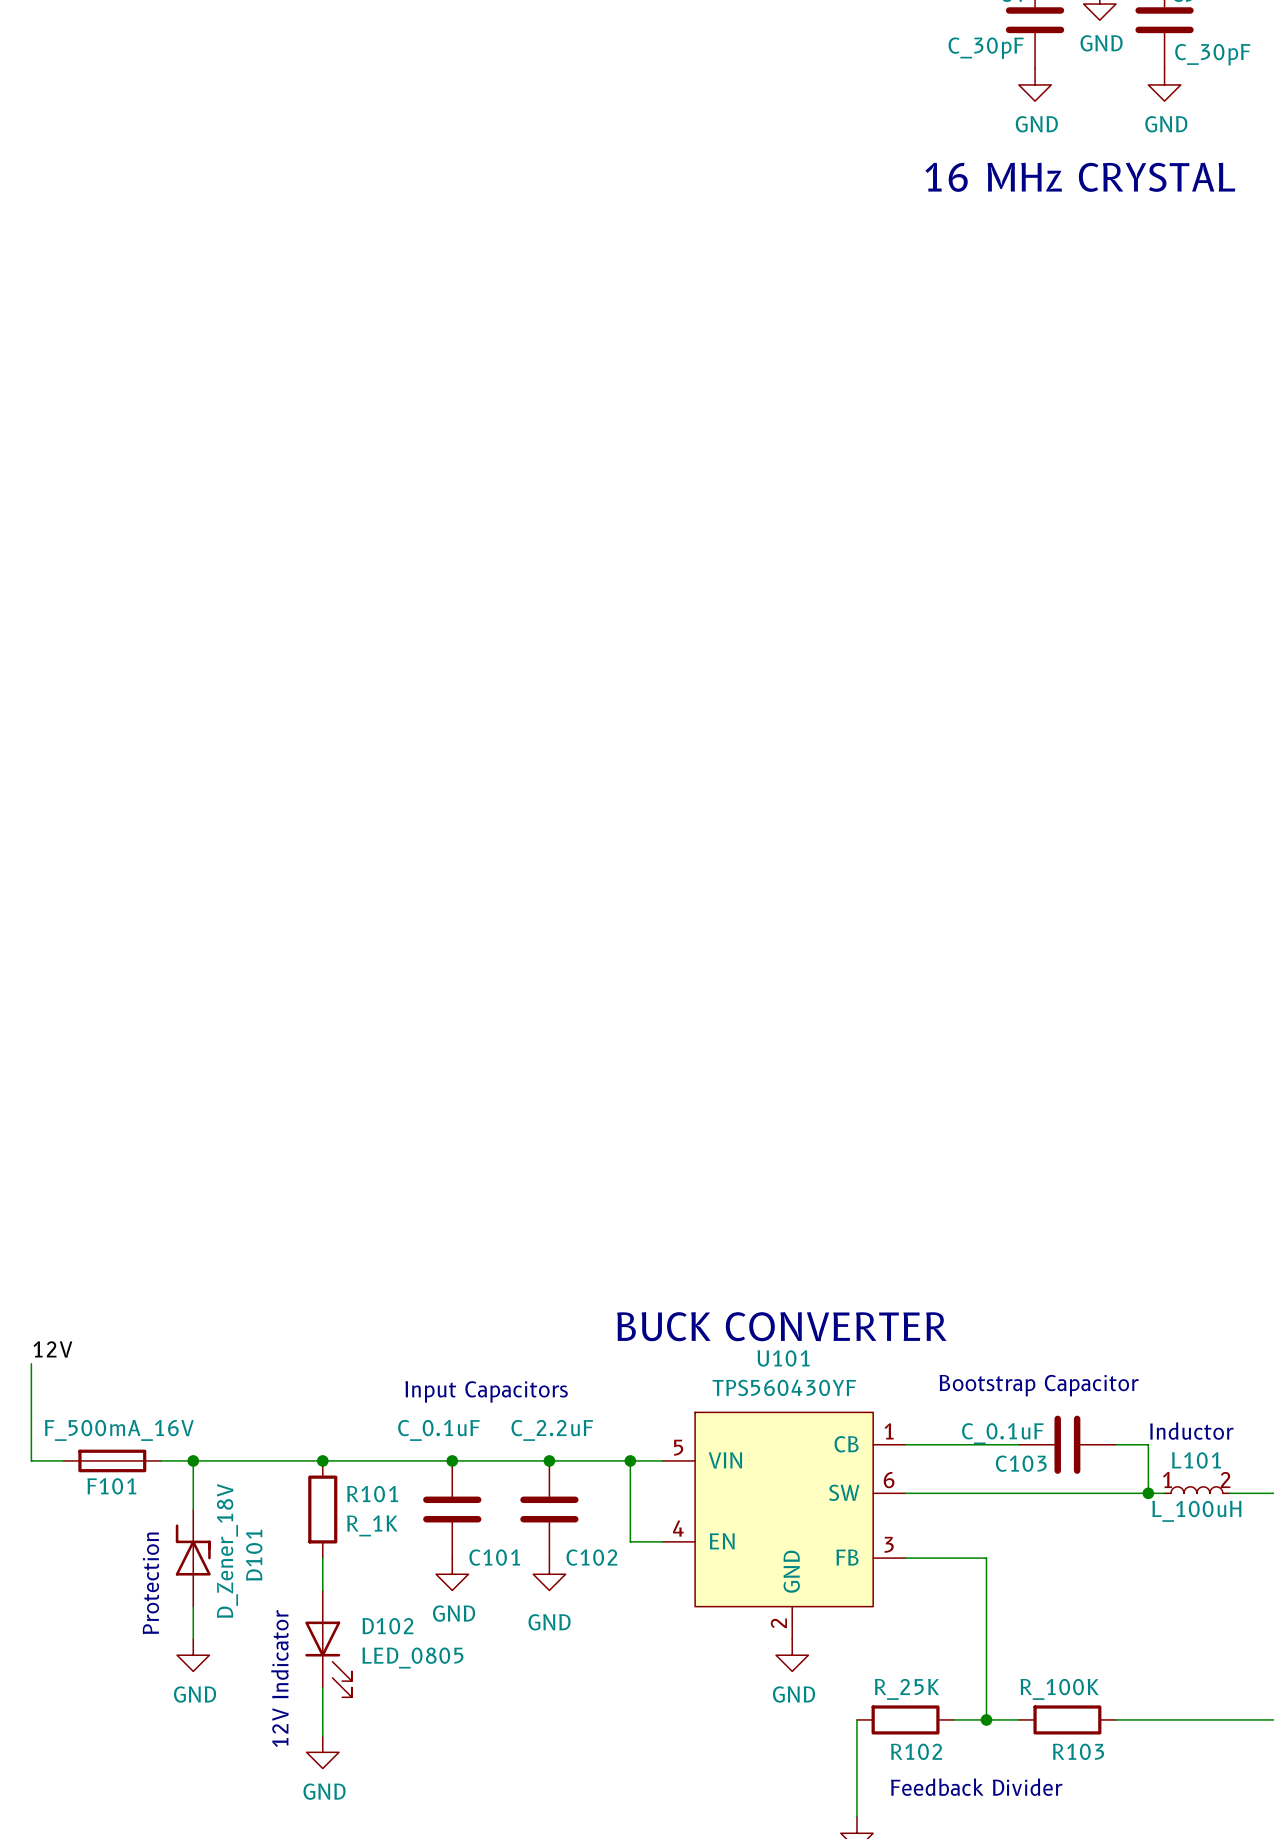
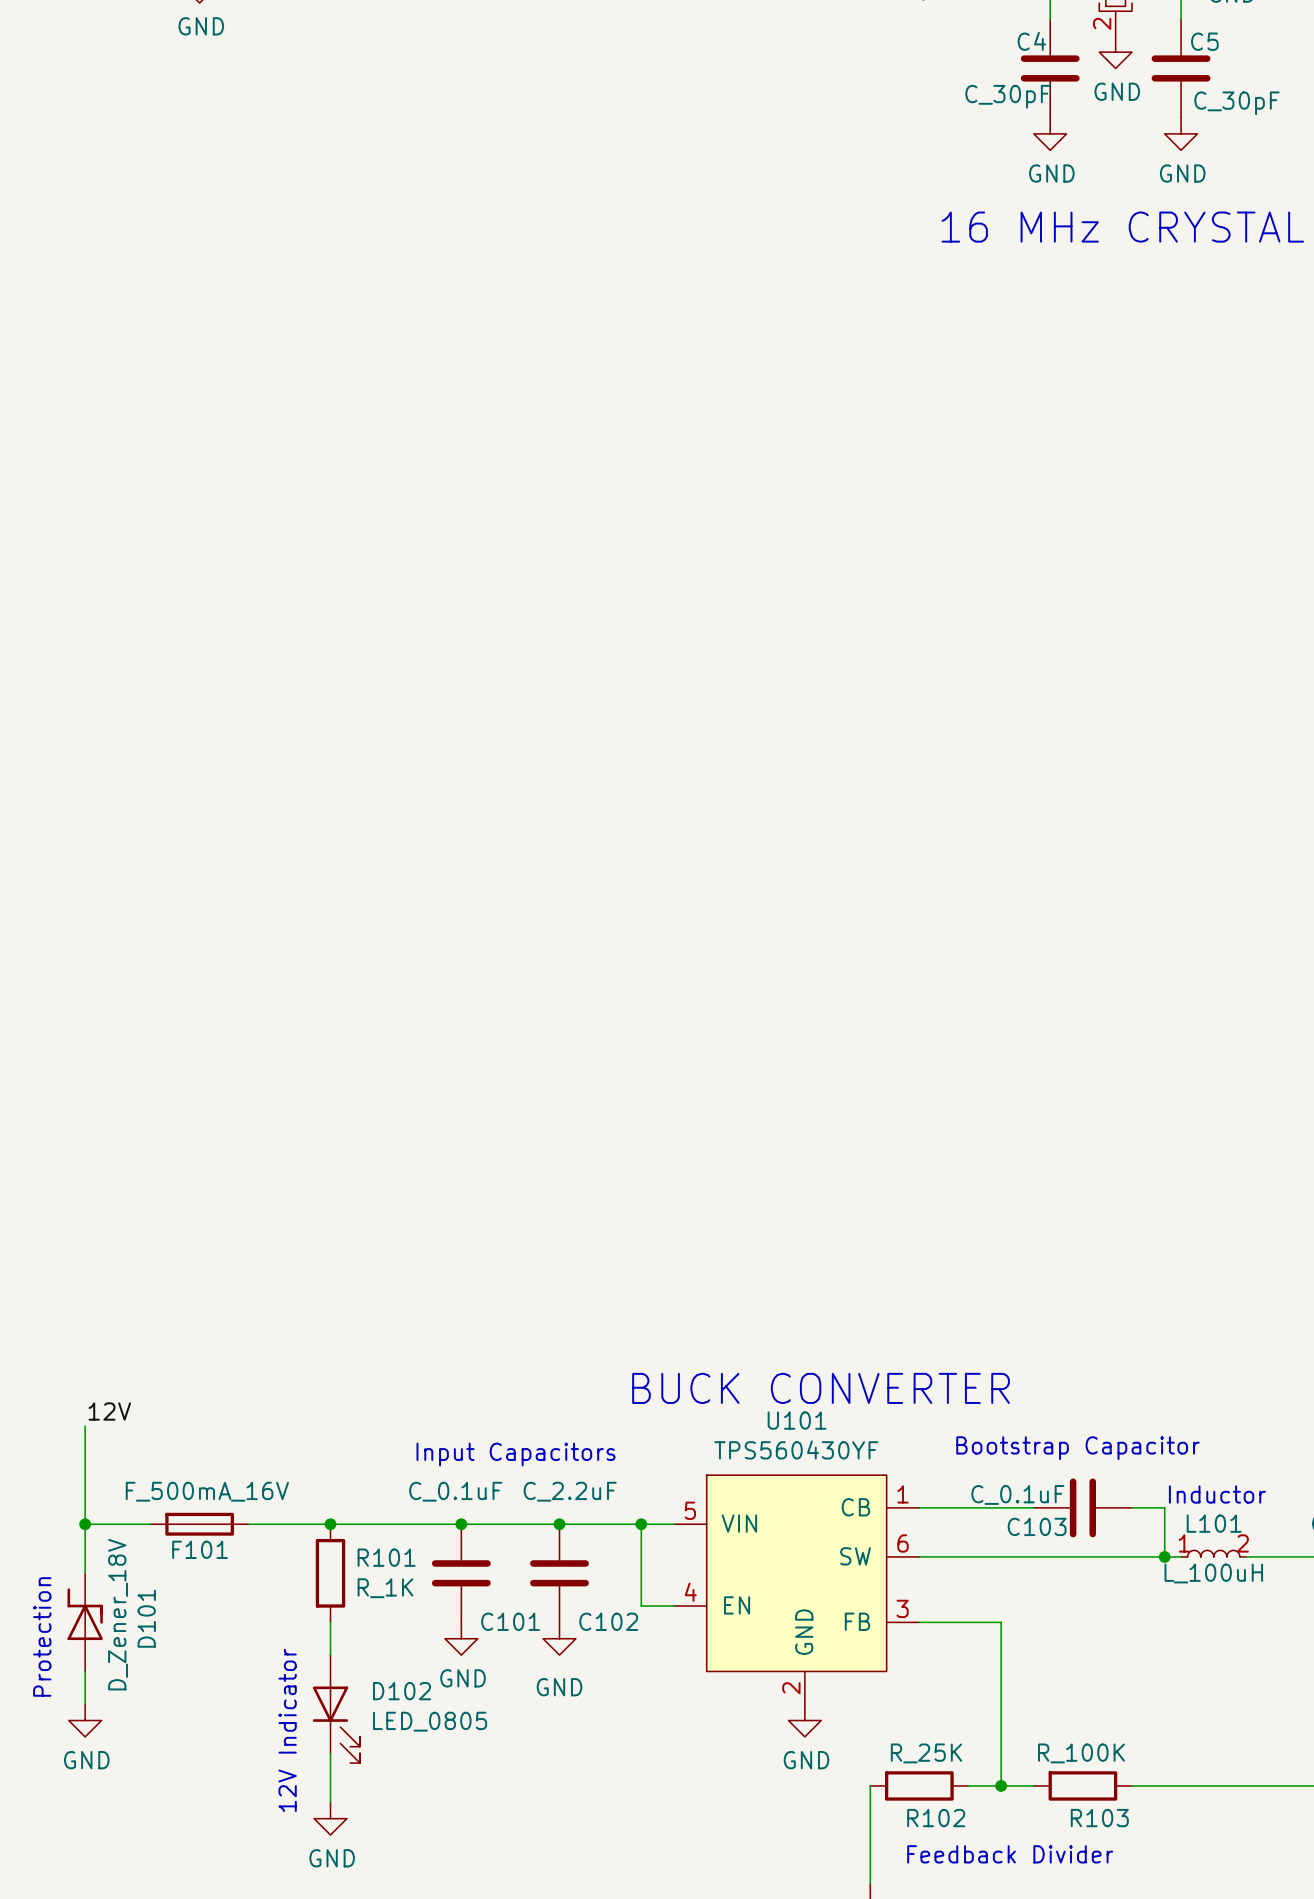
label position: 12V (52, 1349) -> 12V (109, 1411)
wire: (31, 1363) (31, 1460) (63, 1460) -> none
wire: none -> (85, 1426) (85, 1573)
junction: none -> (85, 1524)
F101 position: (112, 1460) -> (199, 1524)
wire: (193, 1460) (193, 1509) -> none
junction: (193, 1460) -> none
D101 position: (193, 1558) -> (85, 1622)
text position: Protection (150, 1583) -> Protection (42, 1636)
wire: (193, 1606) (193, 1639) -> (85, 1671) (85, 1704)
power symbol position: GND (193, 1655) -> GND (85, 1720)

